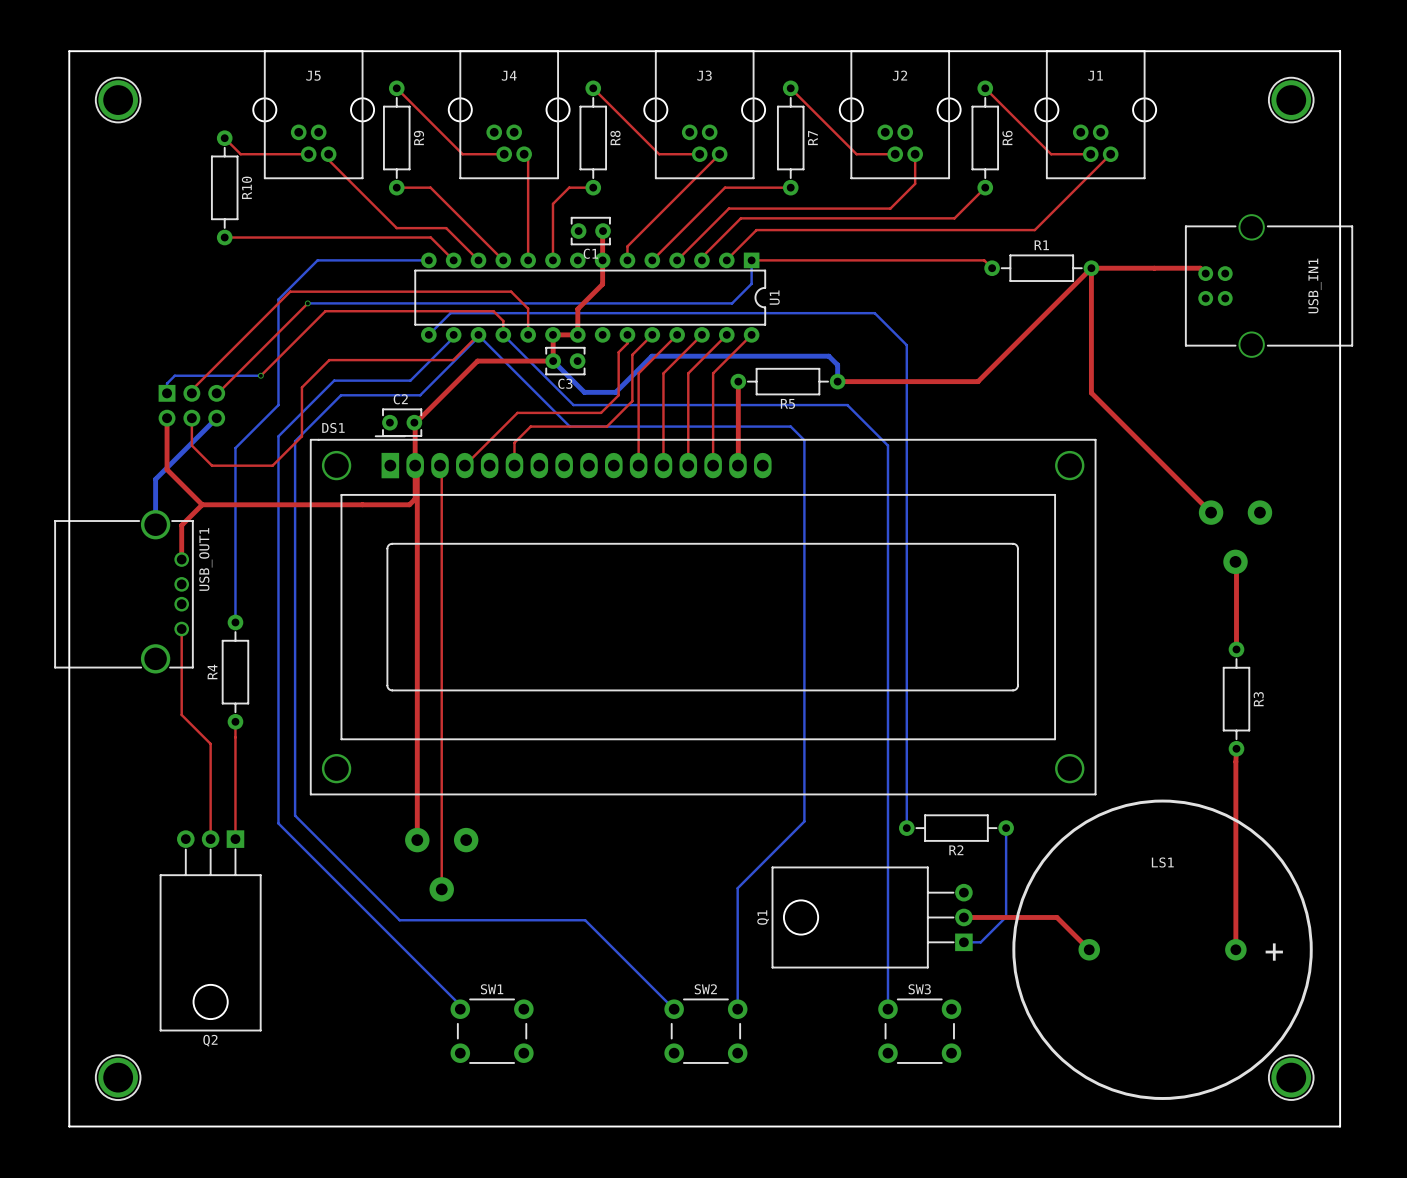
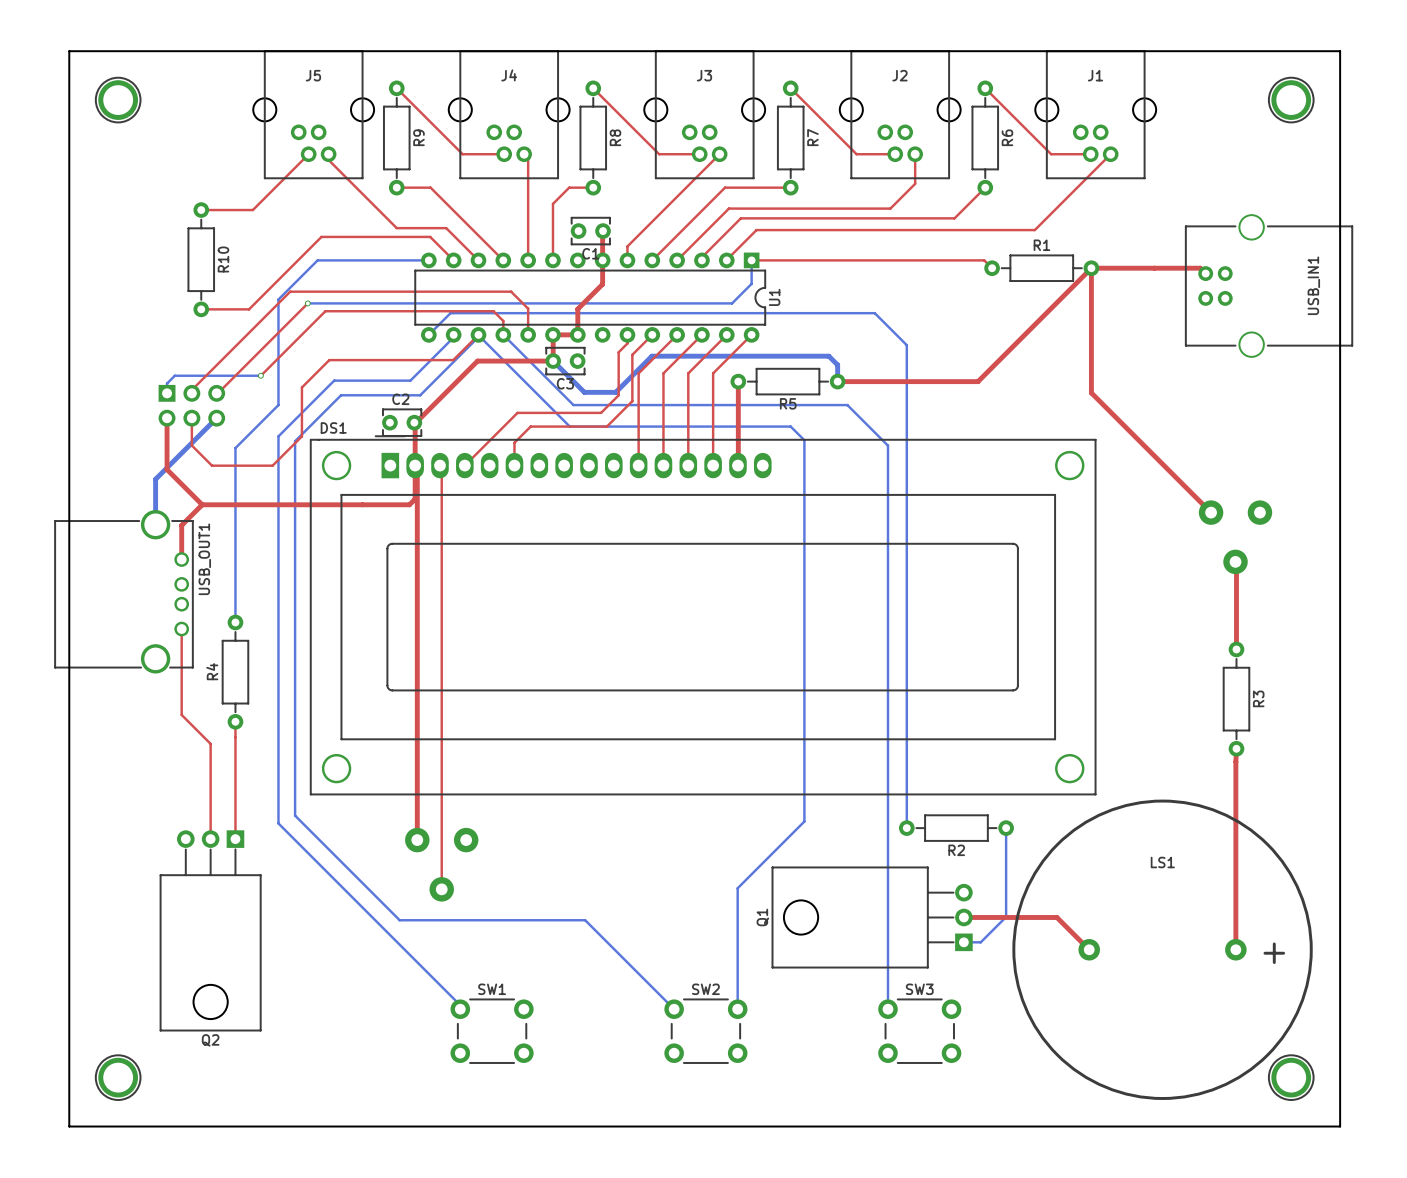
top track: (224, 138) (240, 154) (308, 154) -> none
top track: none -> (308, 154) (252, 210) (201, 210)
R10 position: (224, 187) -> (201, 259)
top track: (224, 237) (430, 237) -> (201, 309) (249, 309) (321, 236) (430, 237)

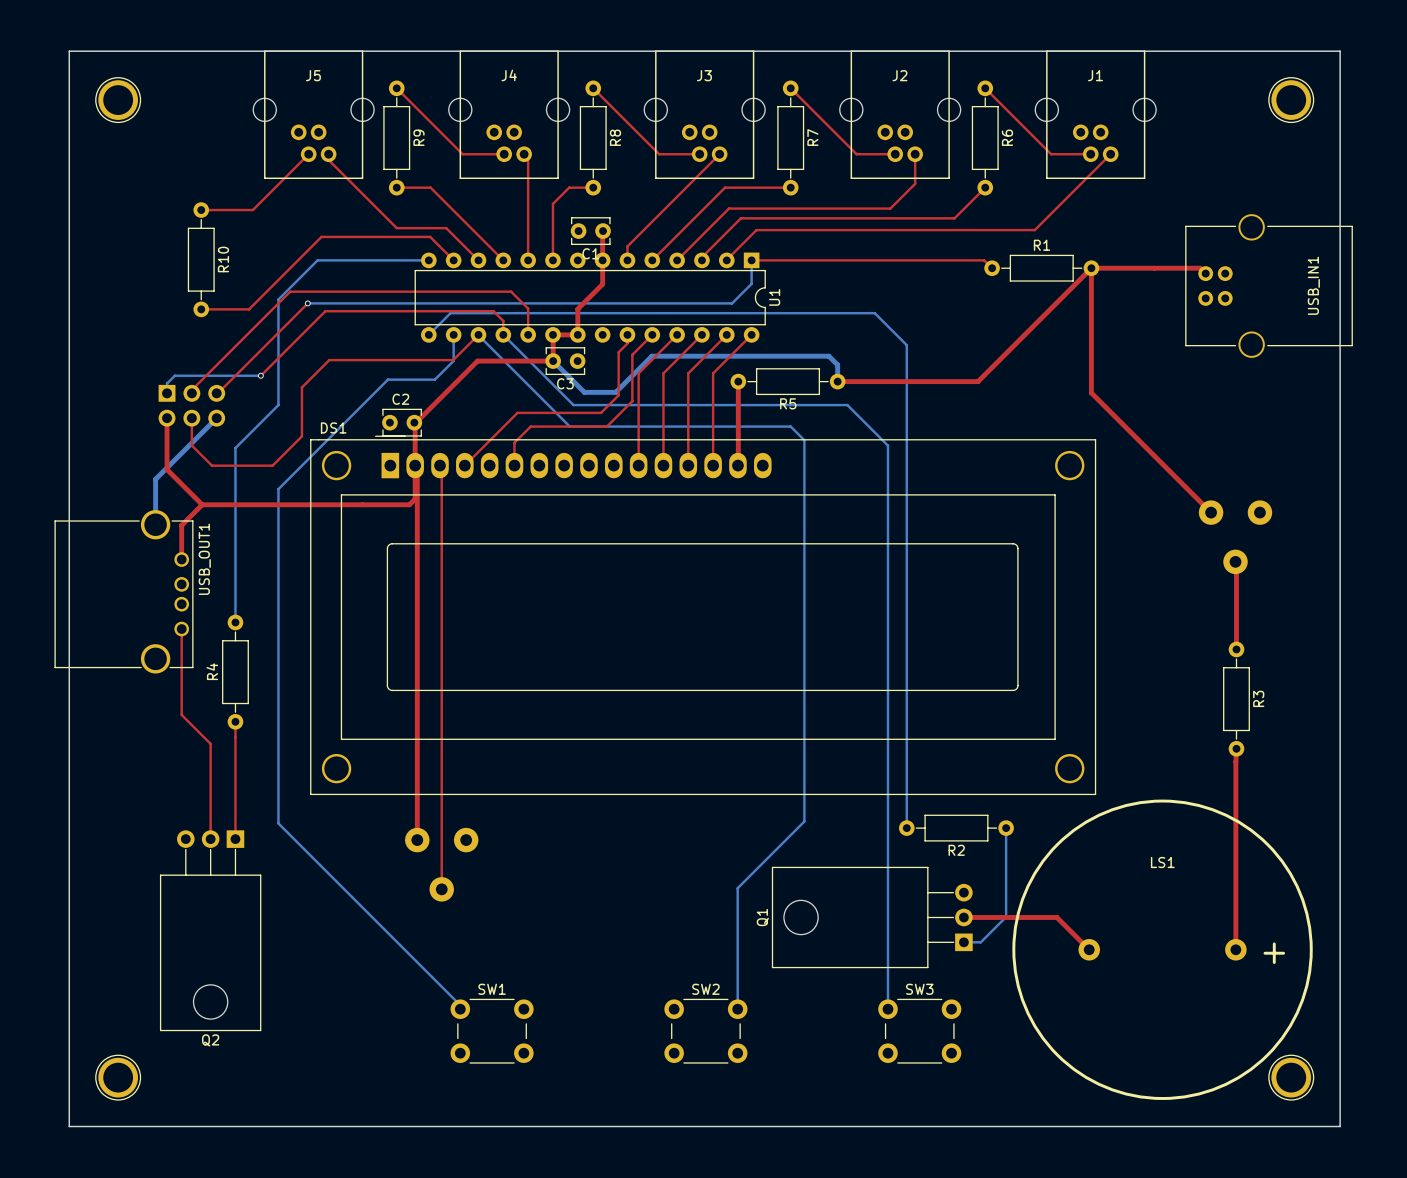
bottom track: (478, 335) (420, 395) (341, 395) (295, 441) (295, 815) (399, 920) (585, 920) (674, 1009) -> none
bottom track: (453, 337) (410, 380) (334, 380) (278, 436) (278, 489) -> (453, 337) (453, 360) (434, 379) (387, 379) (278, 489)

